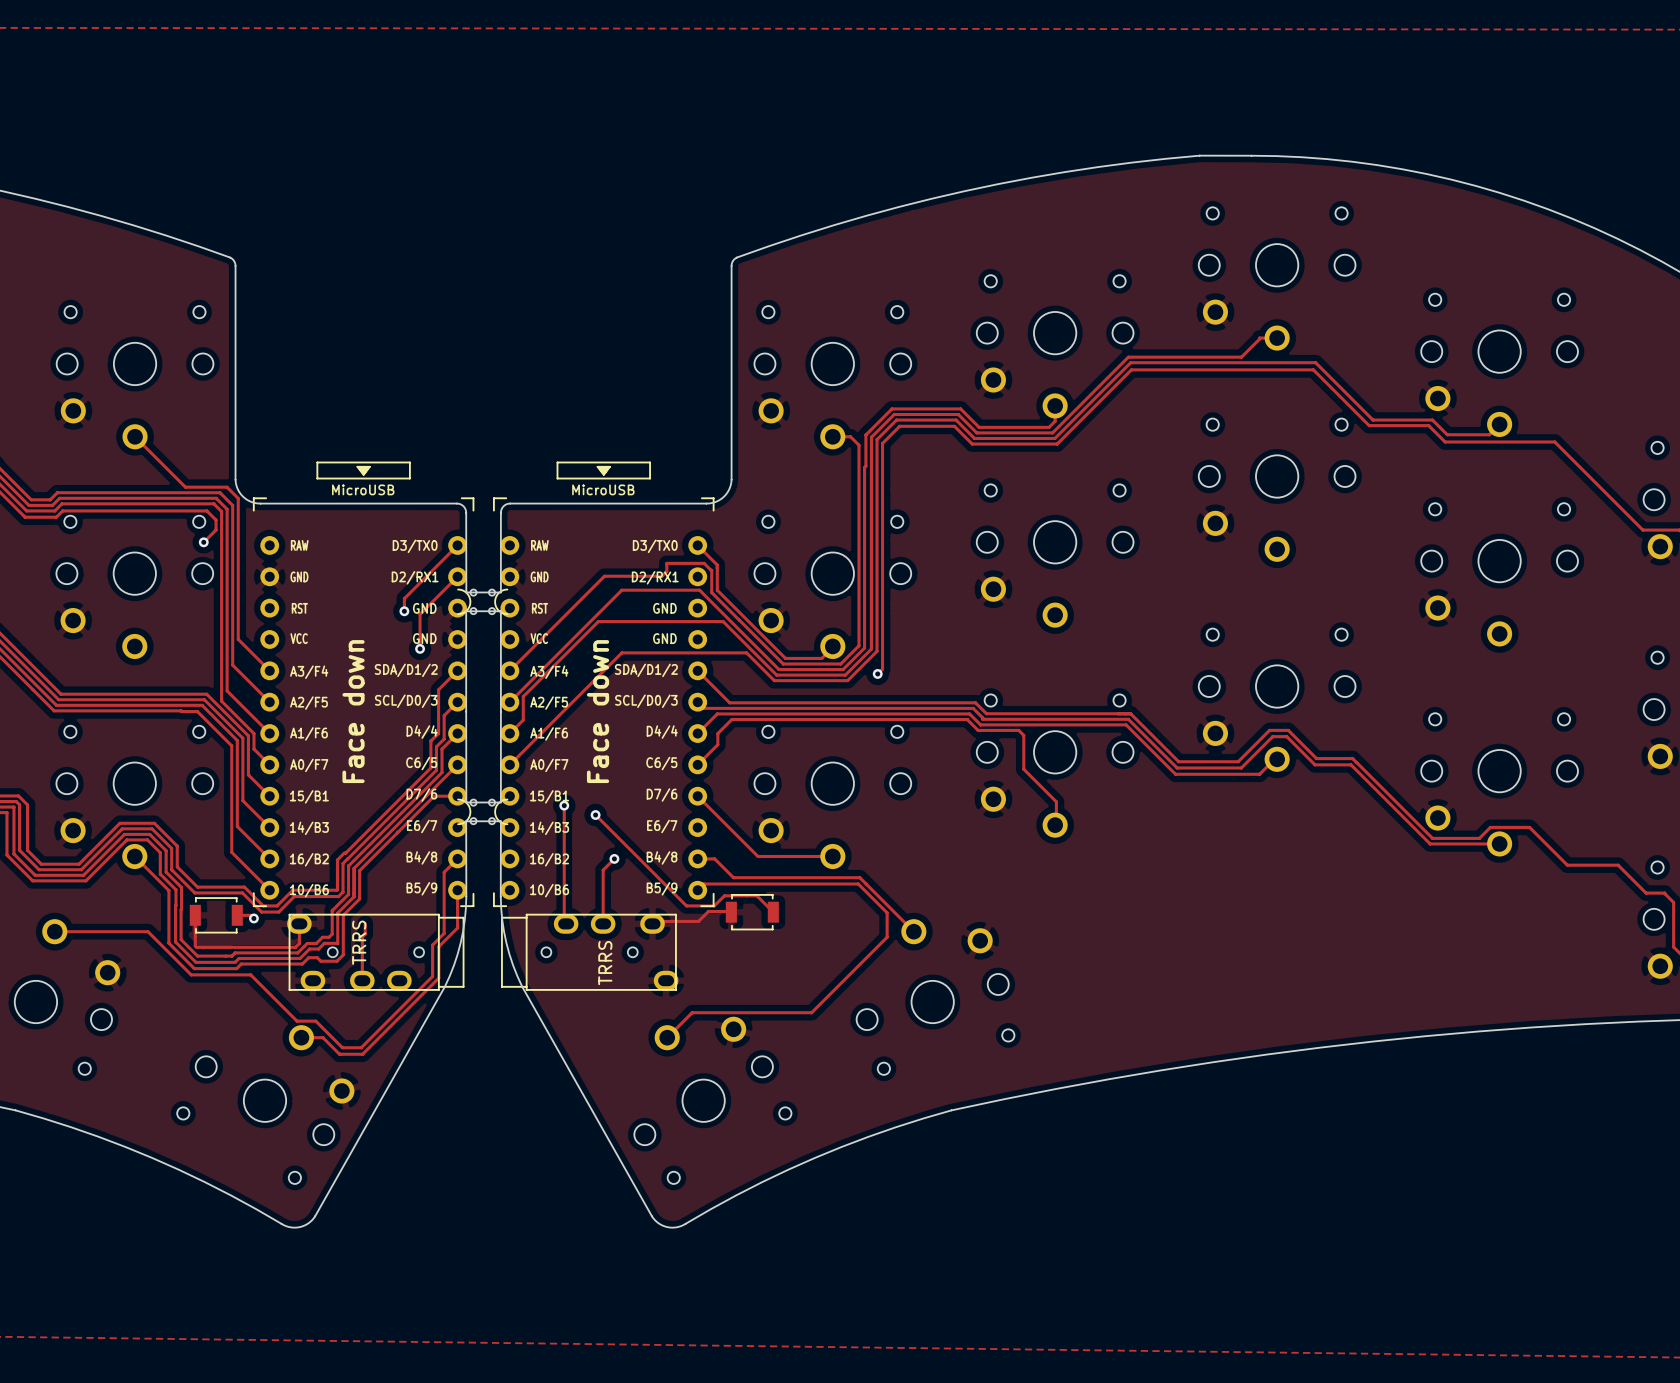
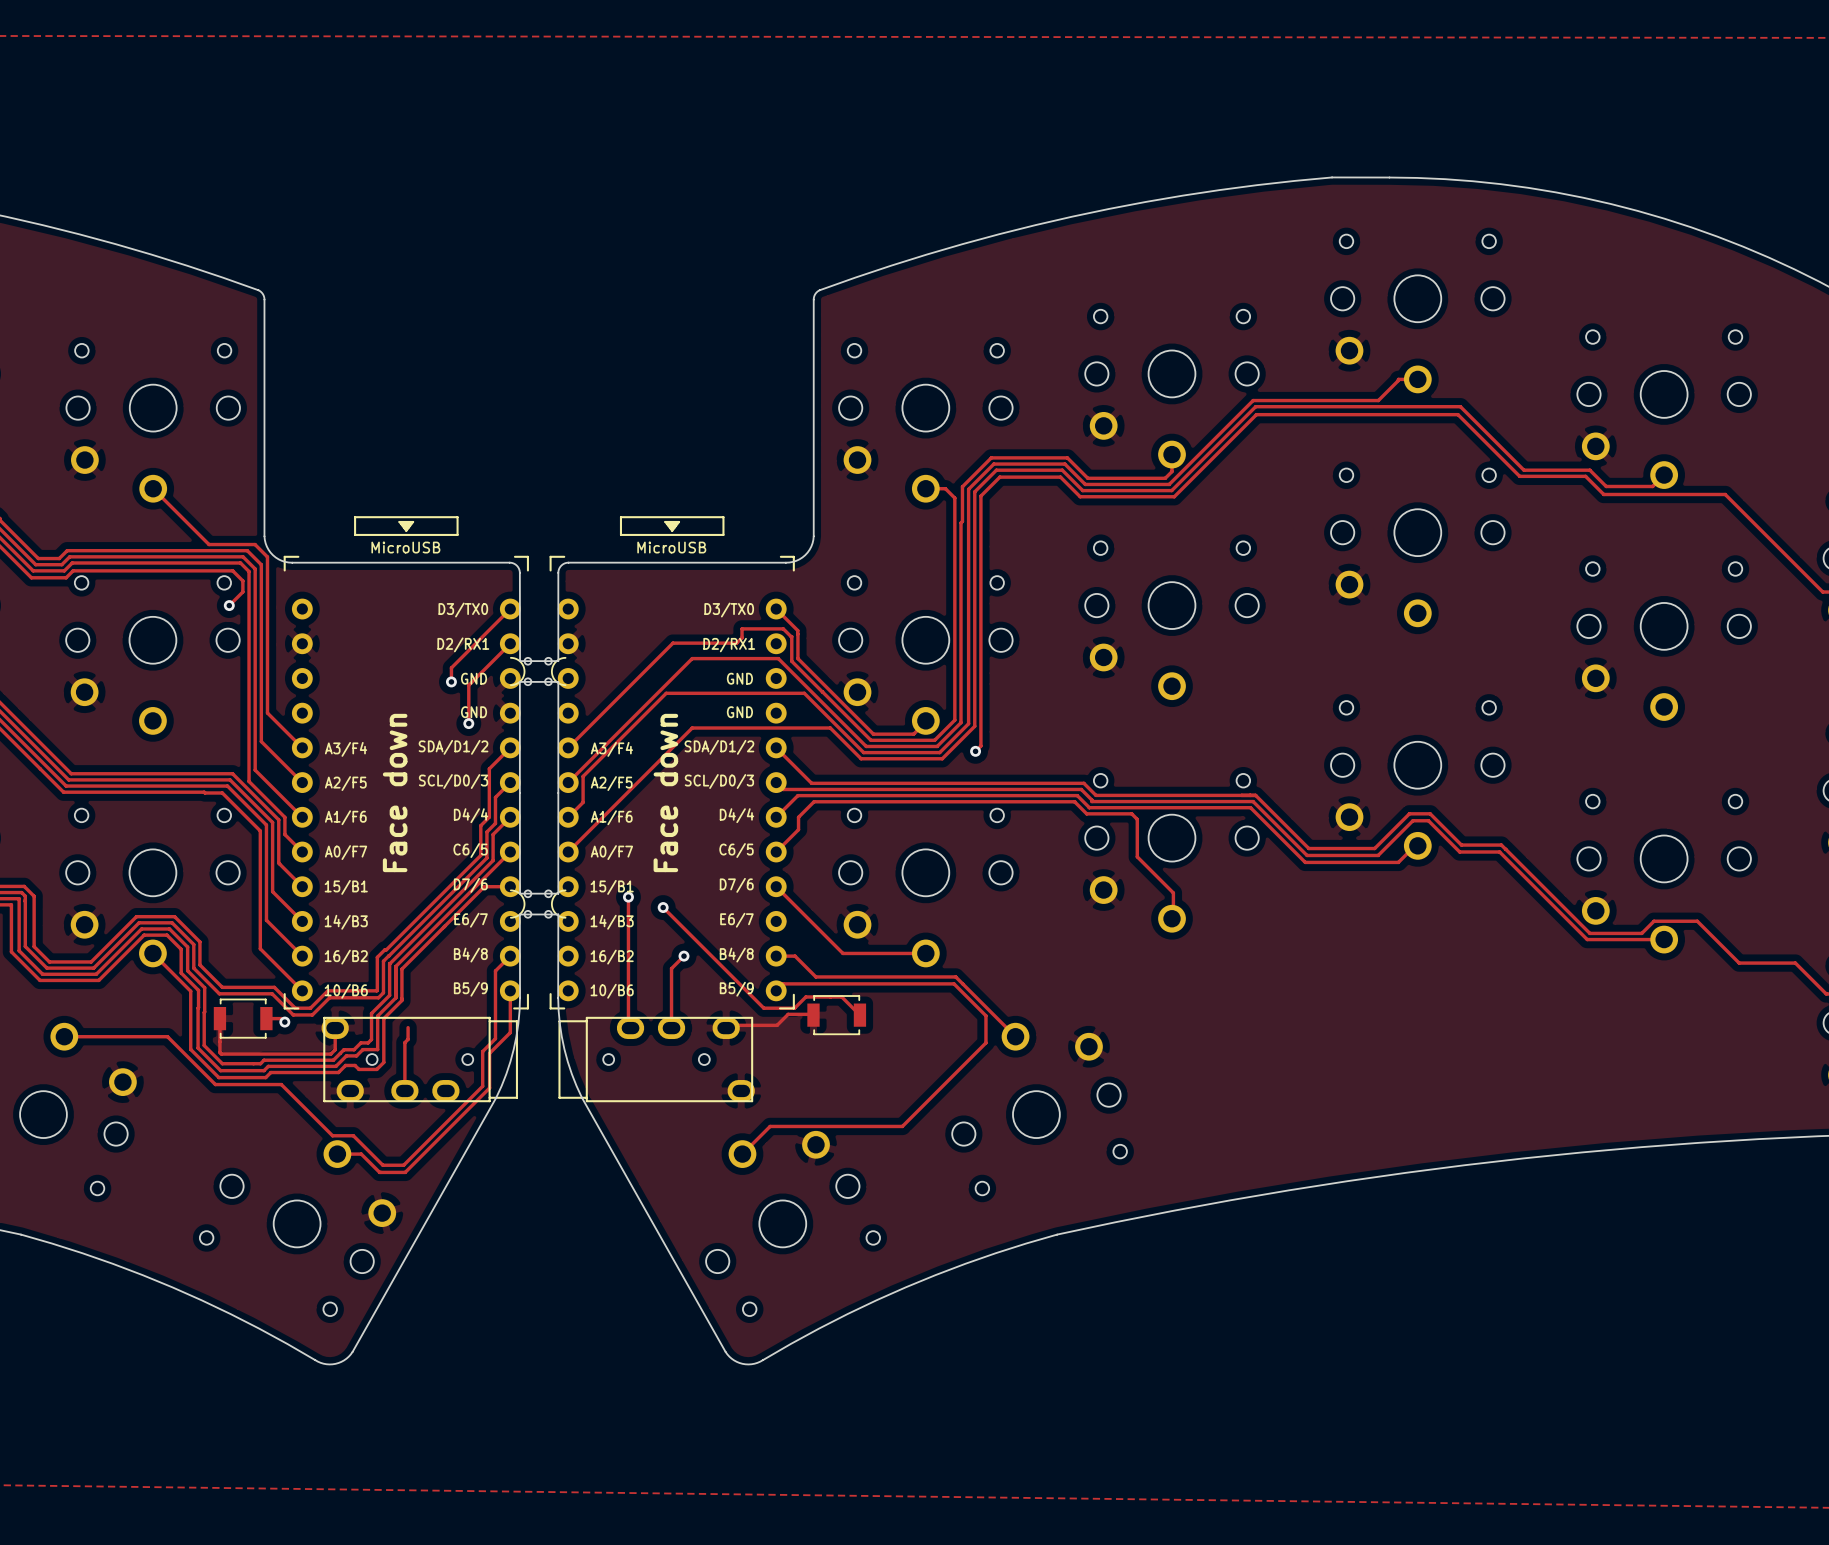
drawing: [290, 540, 309, 645] -> none
drawing: [530, 540, 549, 645] -> none
part text: TRRS (359, 942) -> none
part text: TRRS (605, 963) -> none

